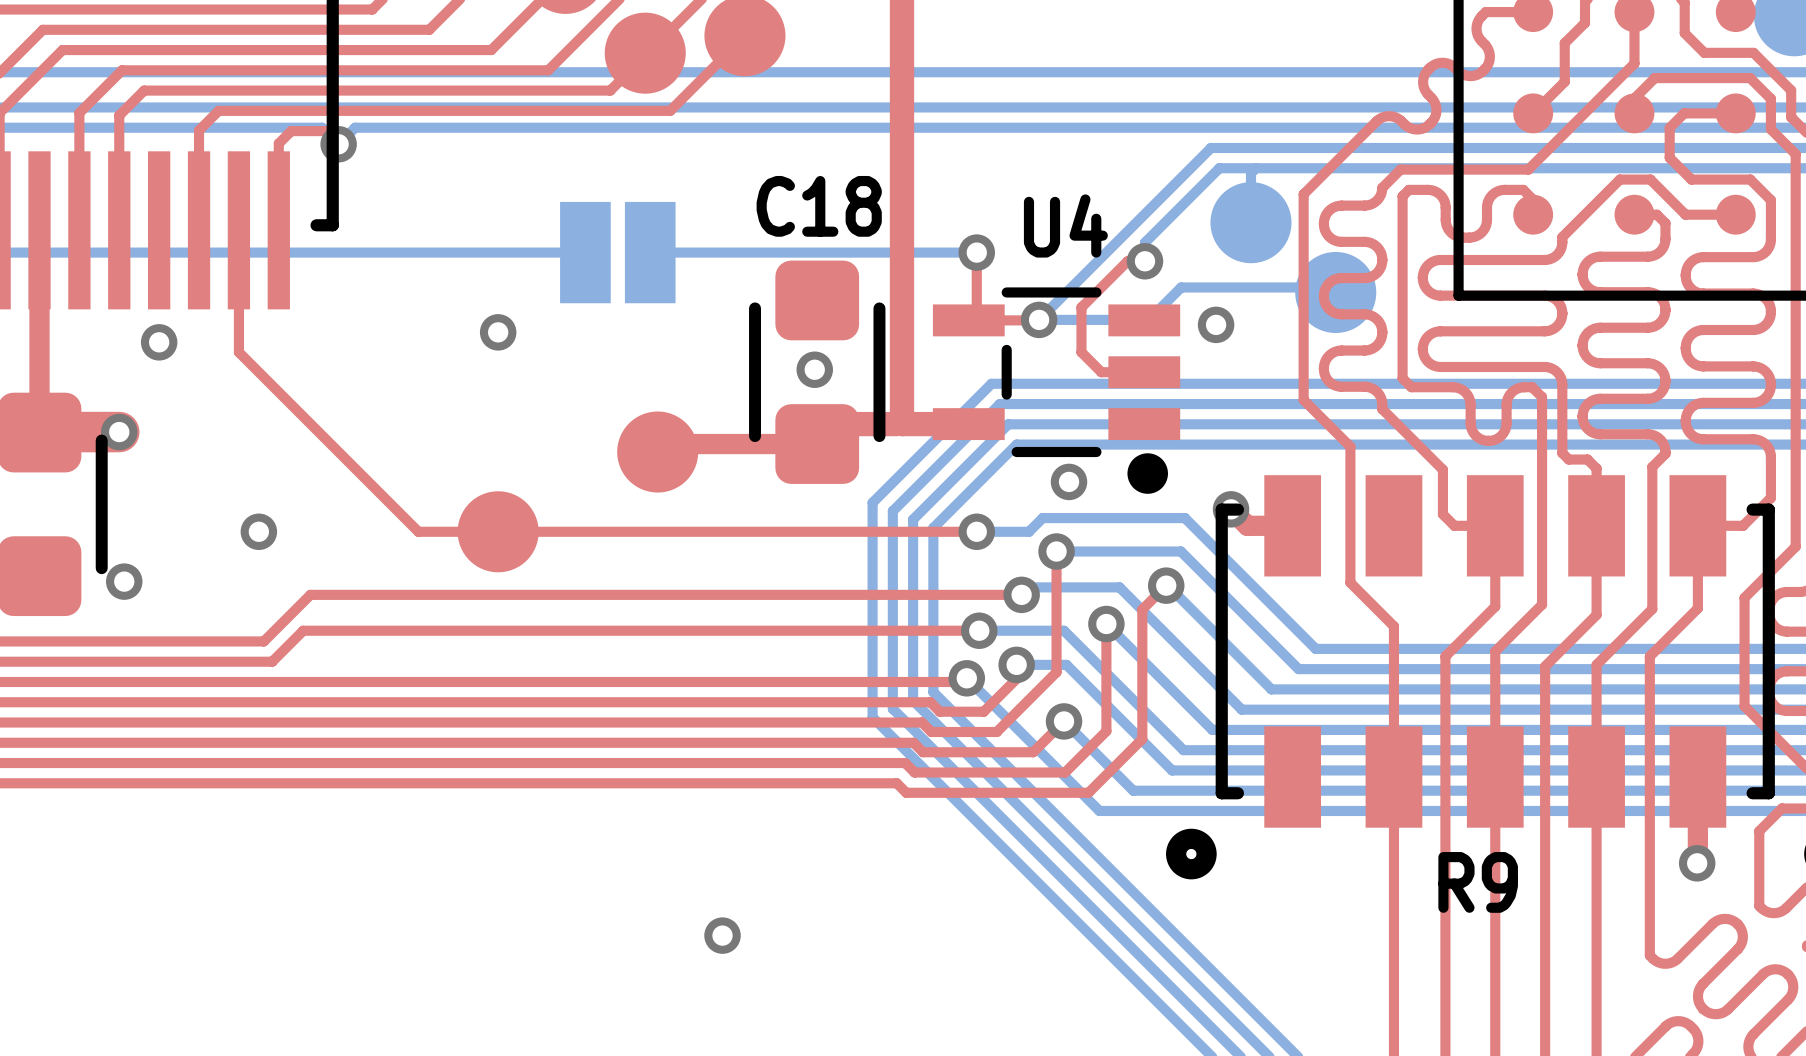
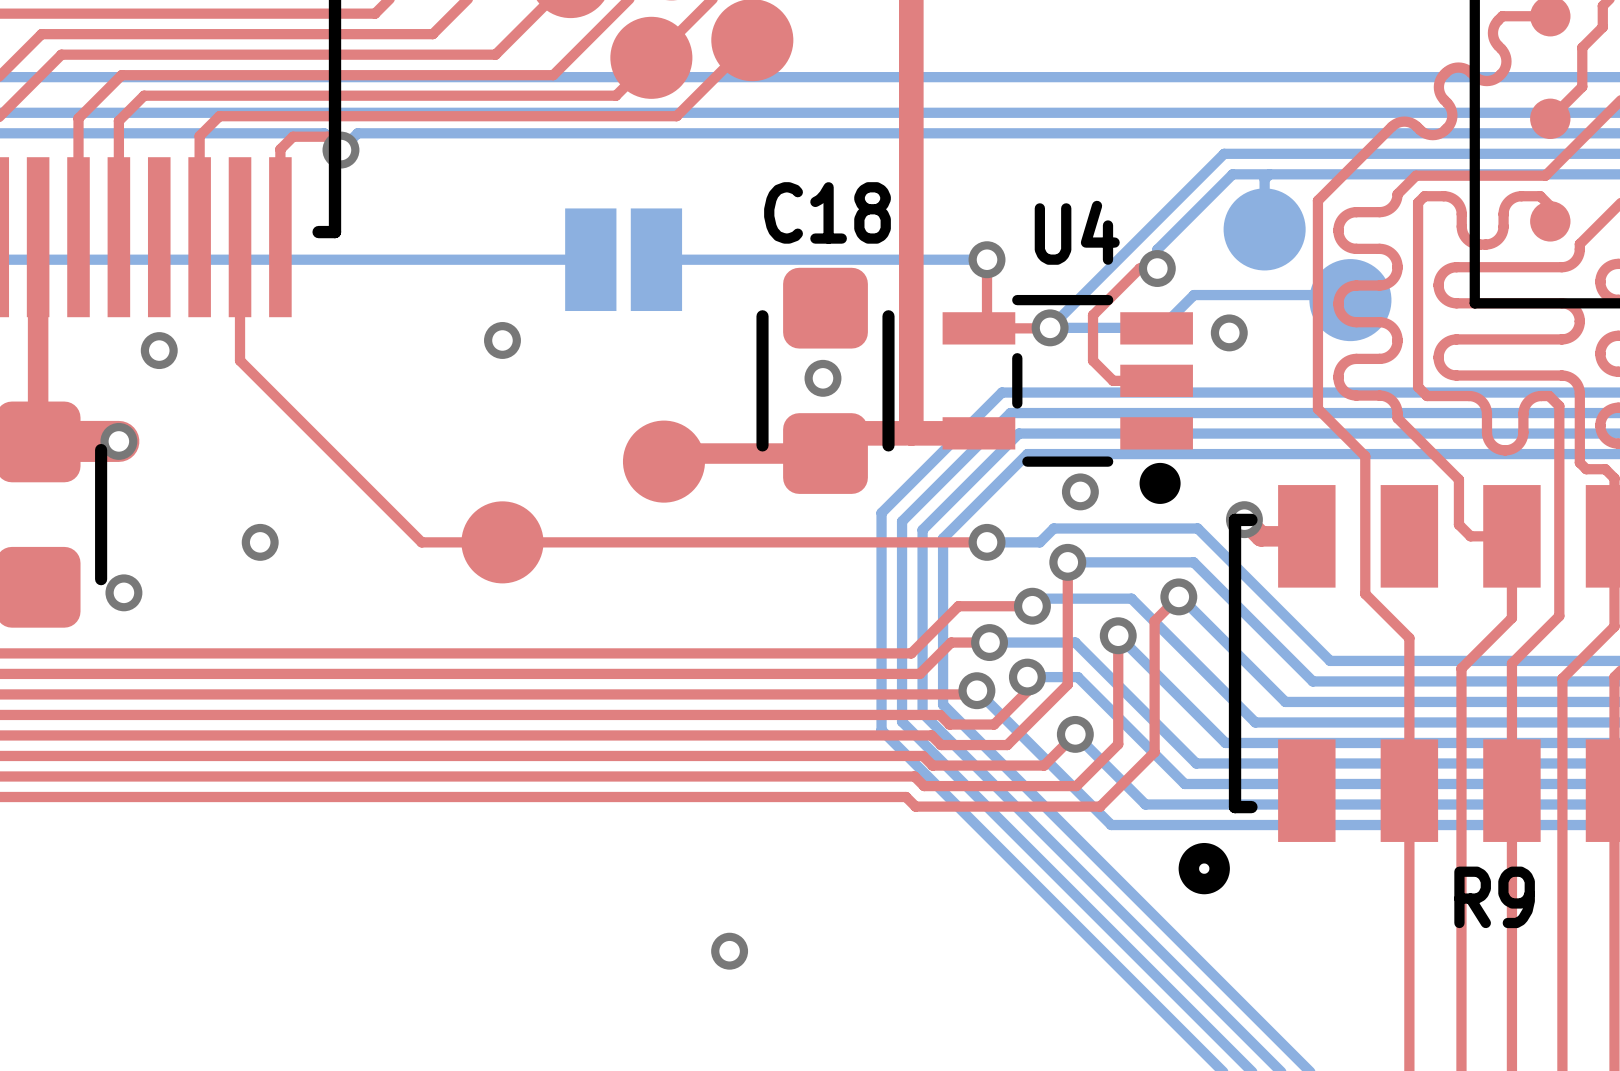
top track: (948, 594) (310, 594) (263, 641) -> (958, 606) (911, 653) (265, 653)
top track: (941, 630) (303, 630) (272, 661) -> (951, 642) (919, 673) (273, 673)

